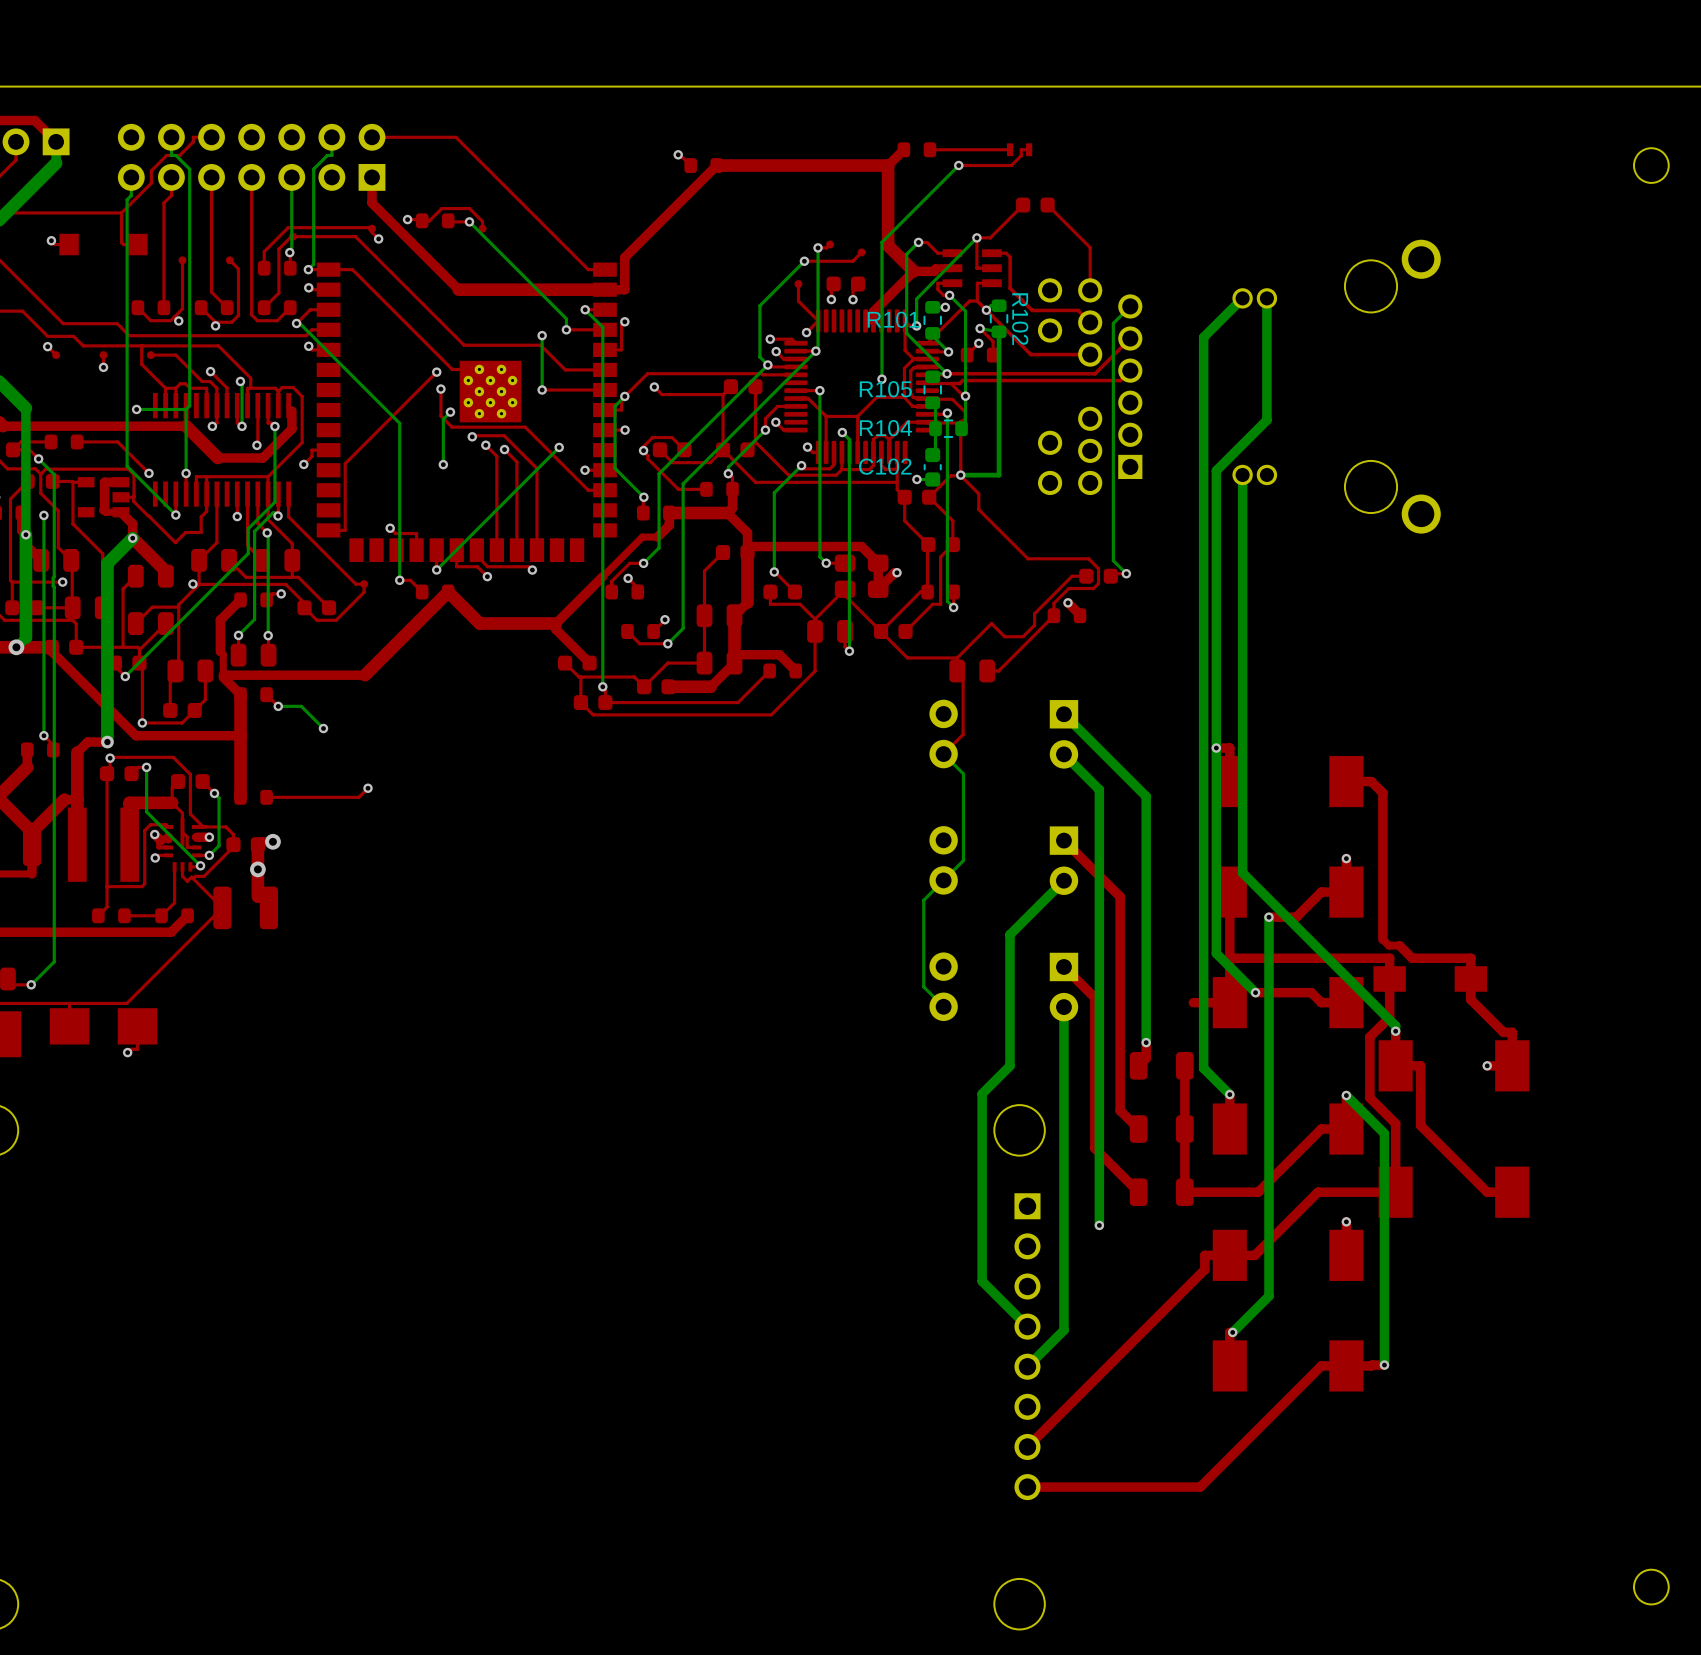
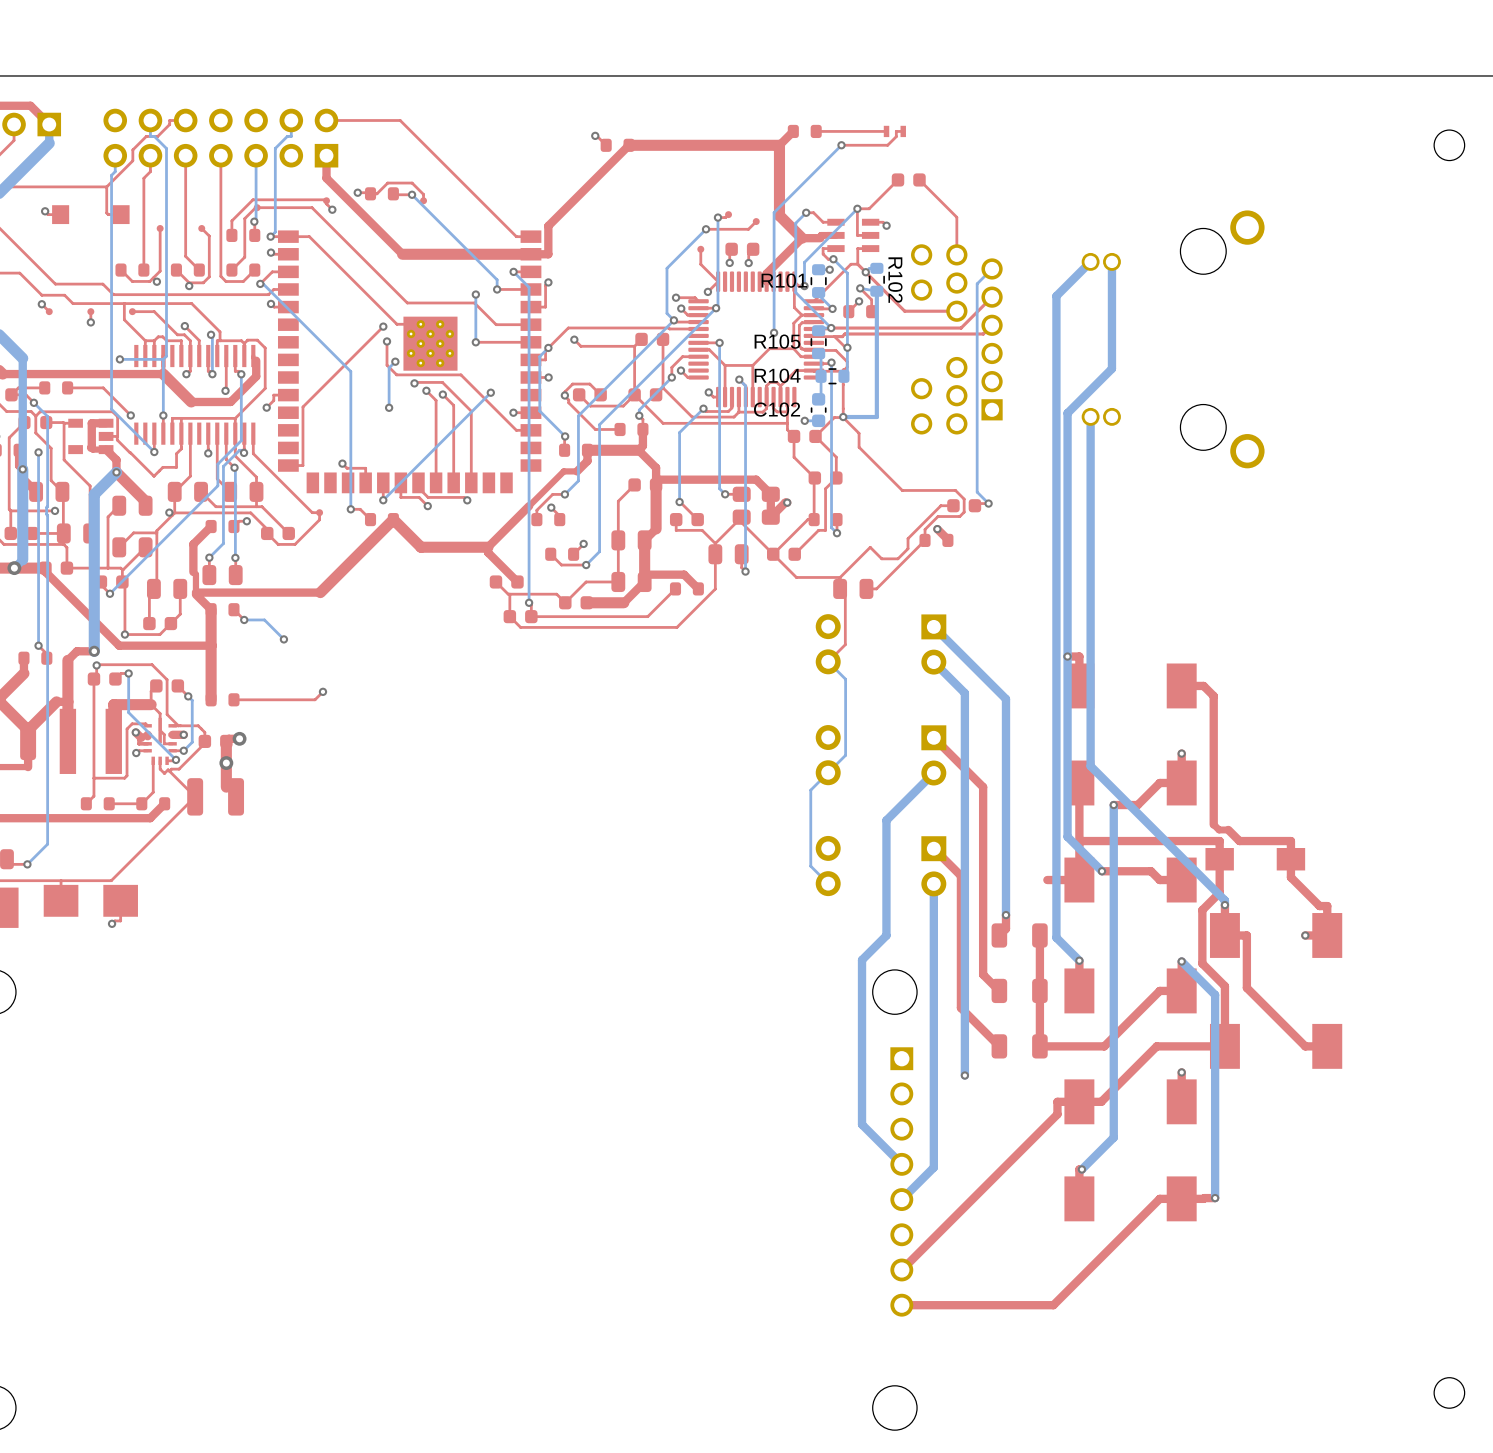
top track: (1010, 257) (1010, 288) (1032, 310) (1078, 310) (1090, 322) -> none
via: none -> (886, 225)

